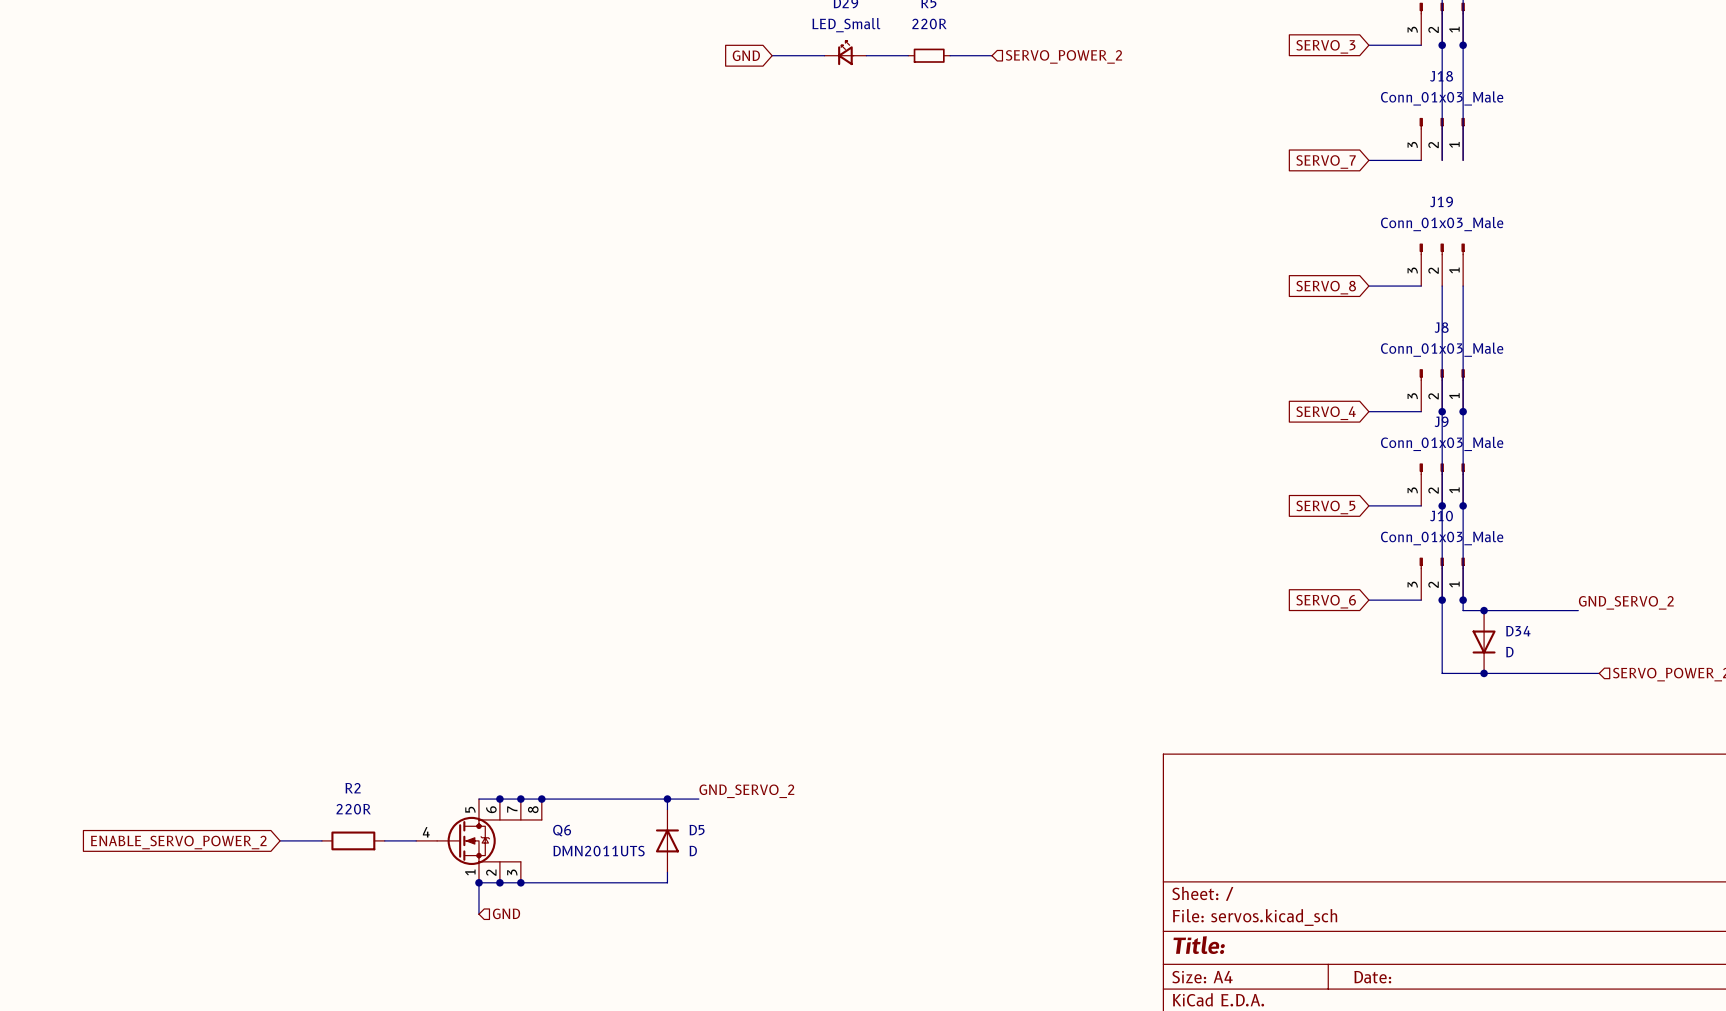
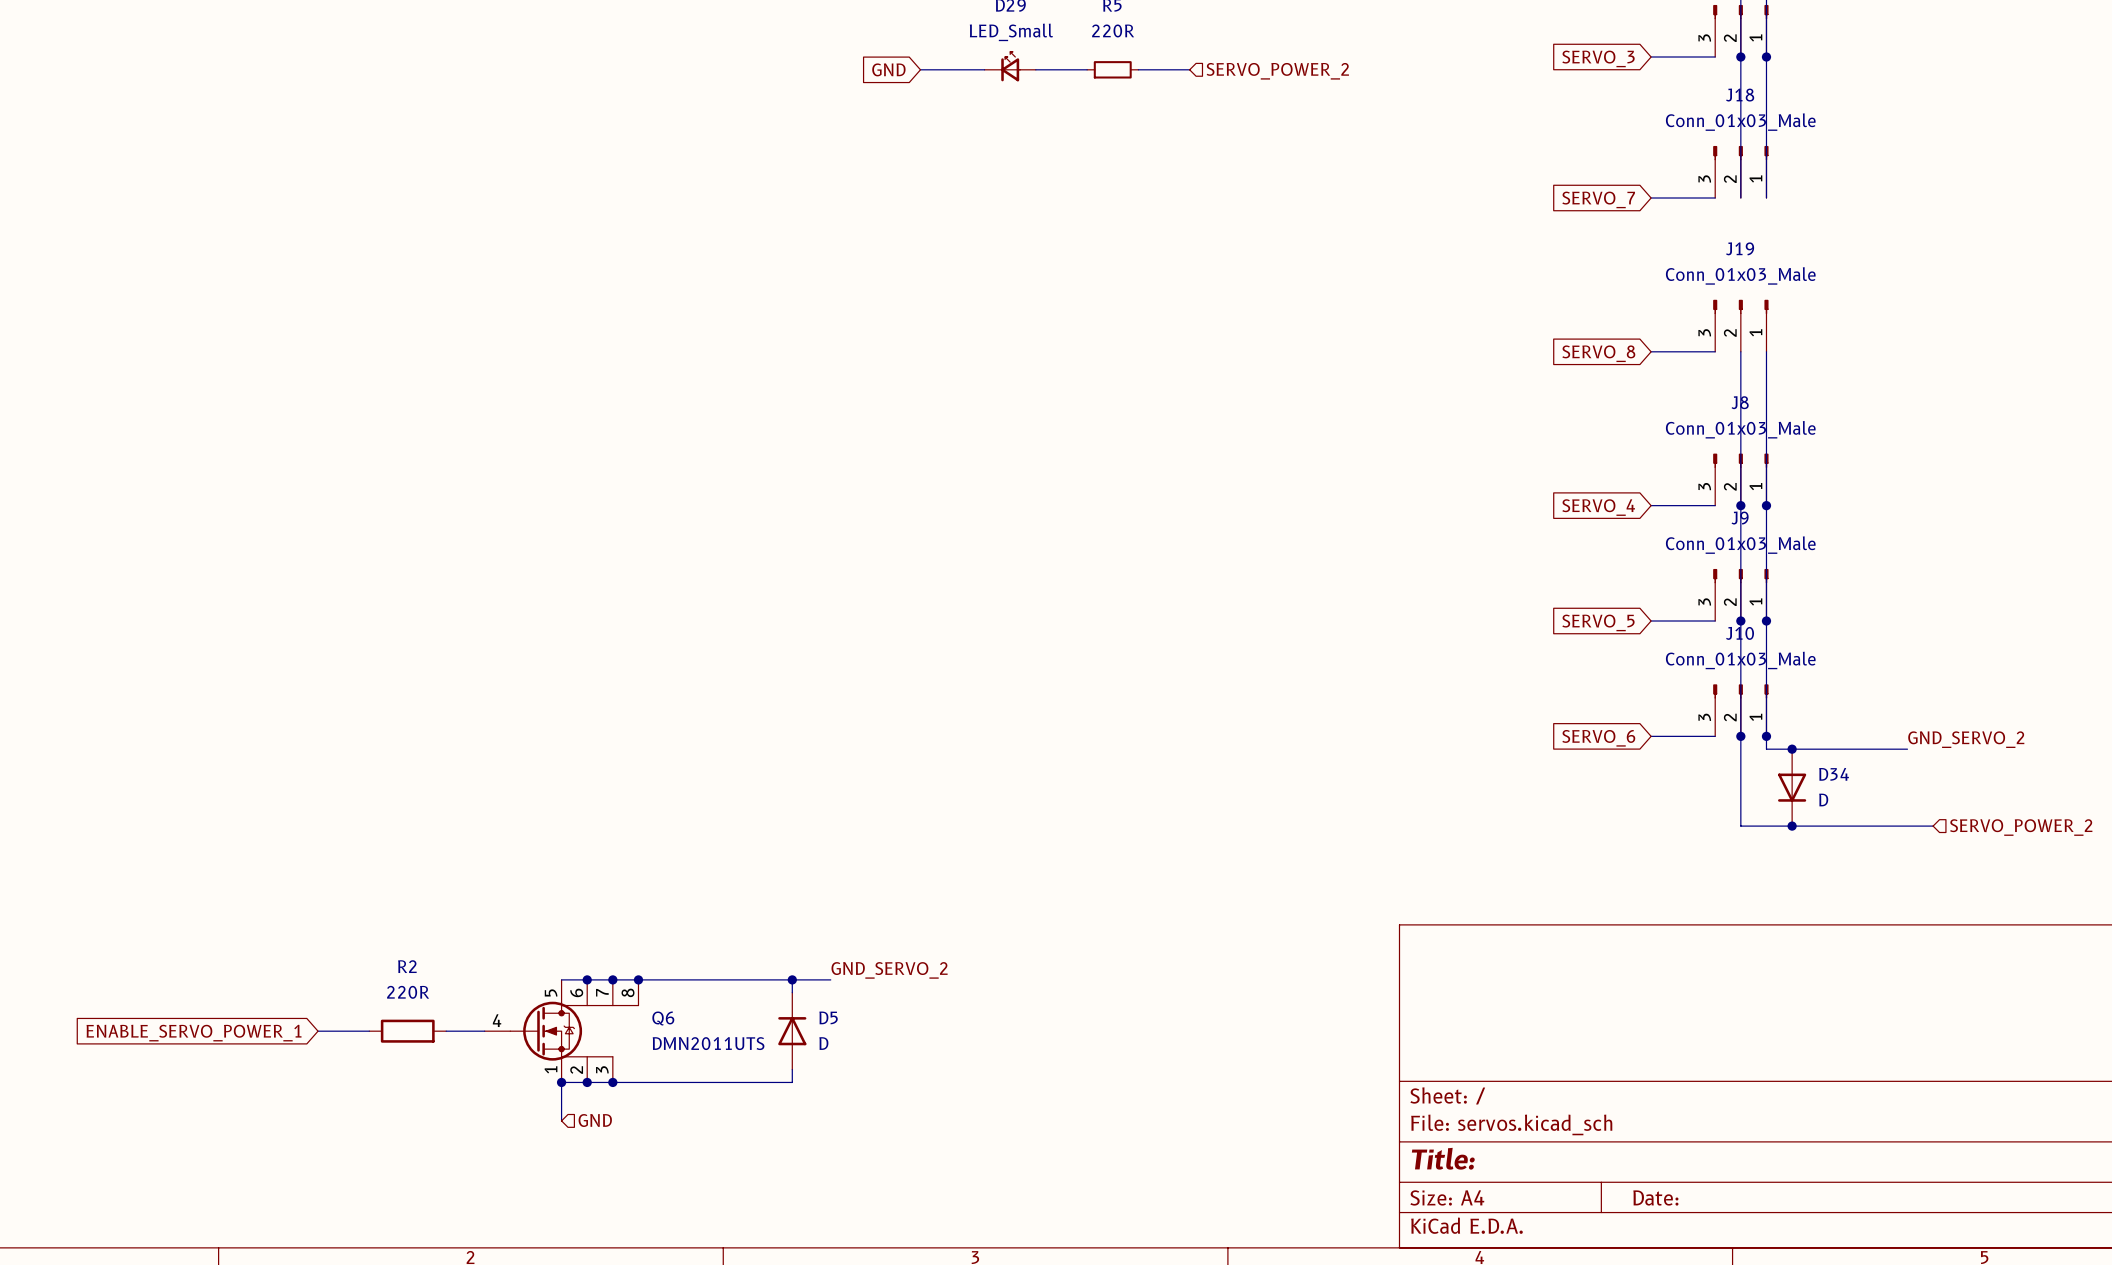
global label: ENABLE_SERVO_POWER_2 (178, 842) -> ENABLE_SERVO_POWER_1 (194, 1033)

